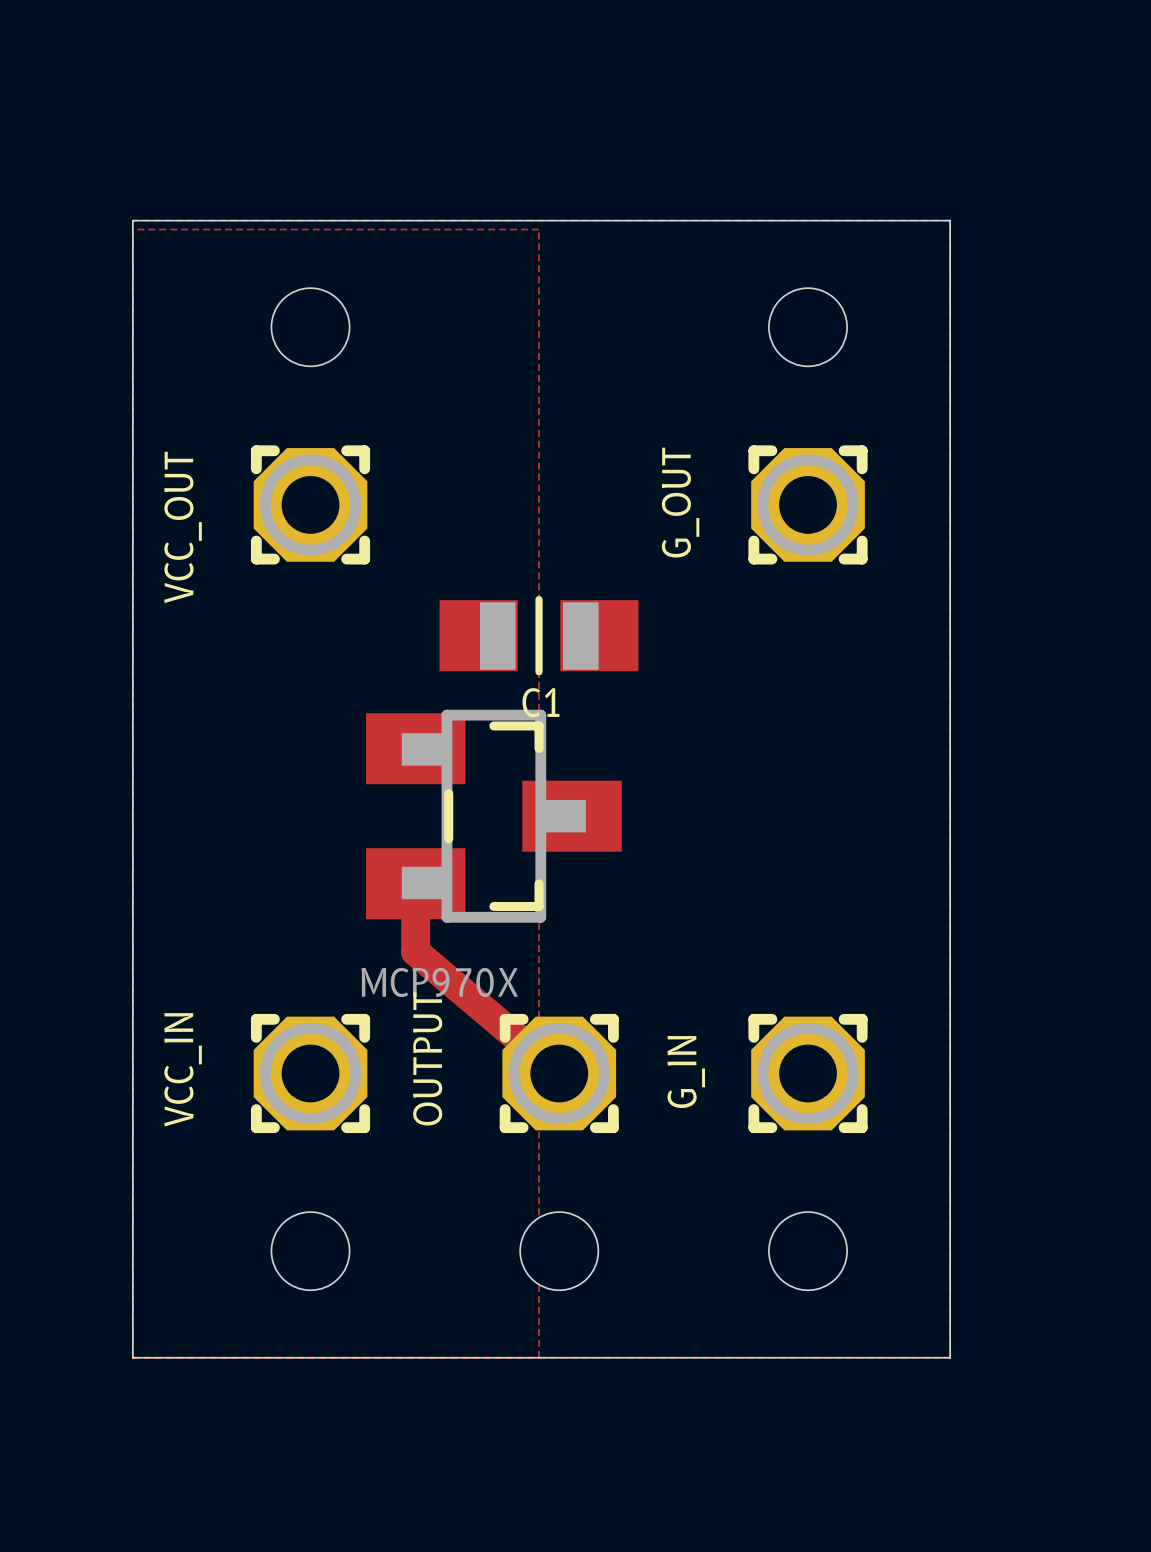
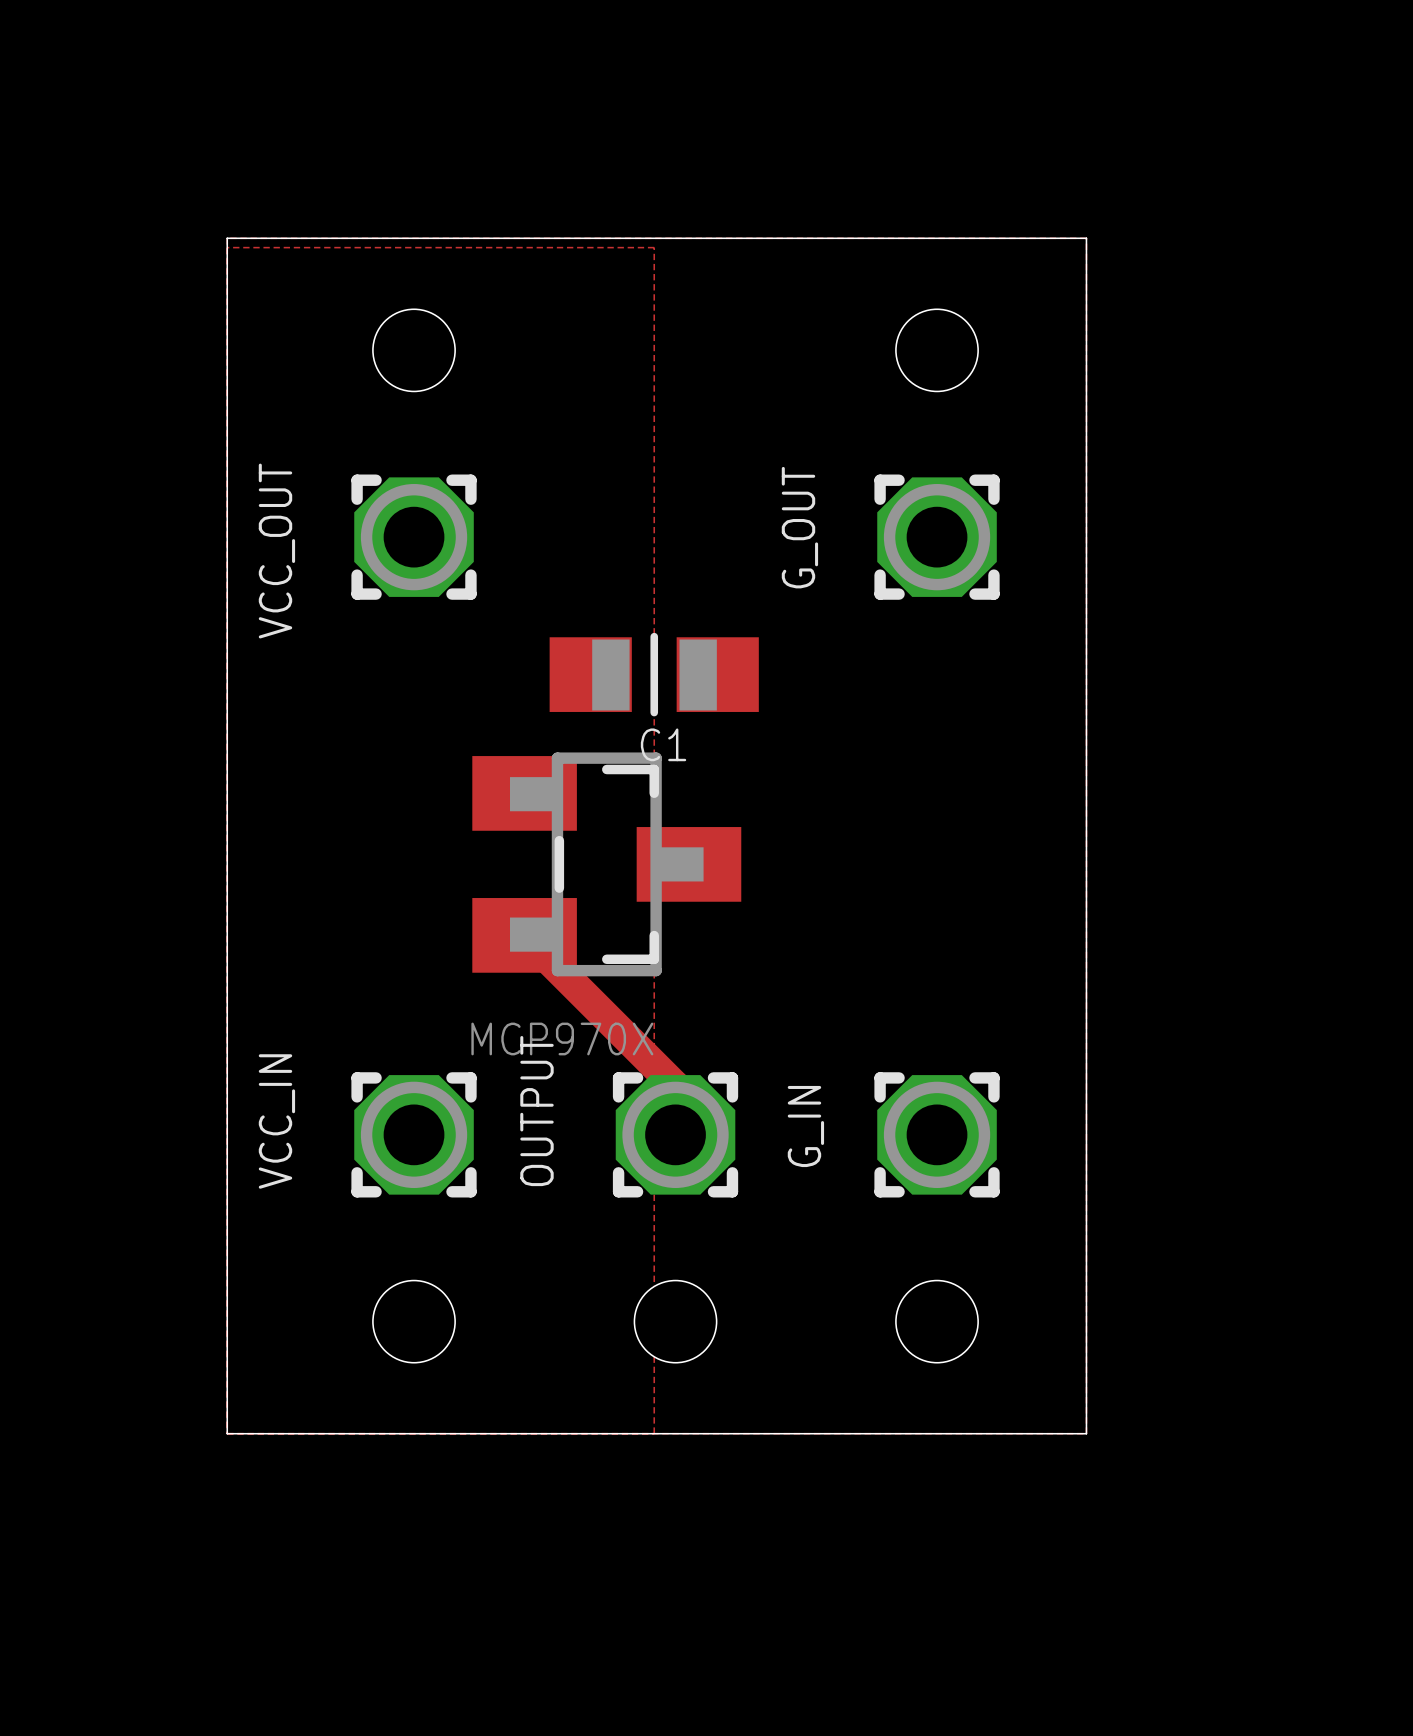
track: (415, 883) (415, 951) (559, 1073) -> (524, 935) (675, 1086) (675, 1134)

